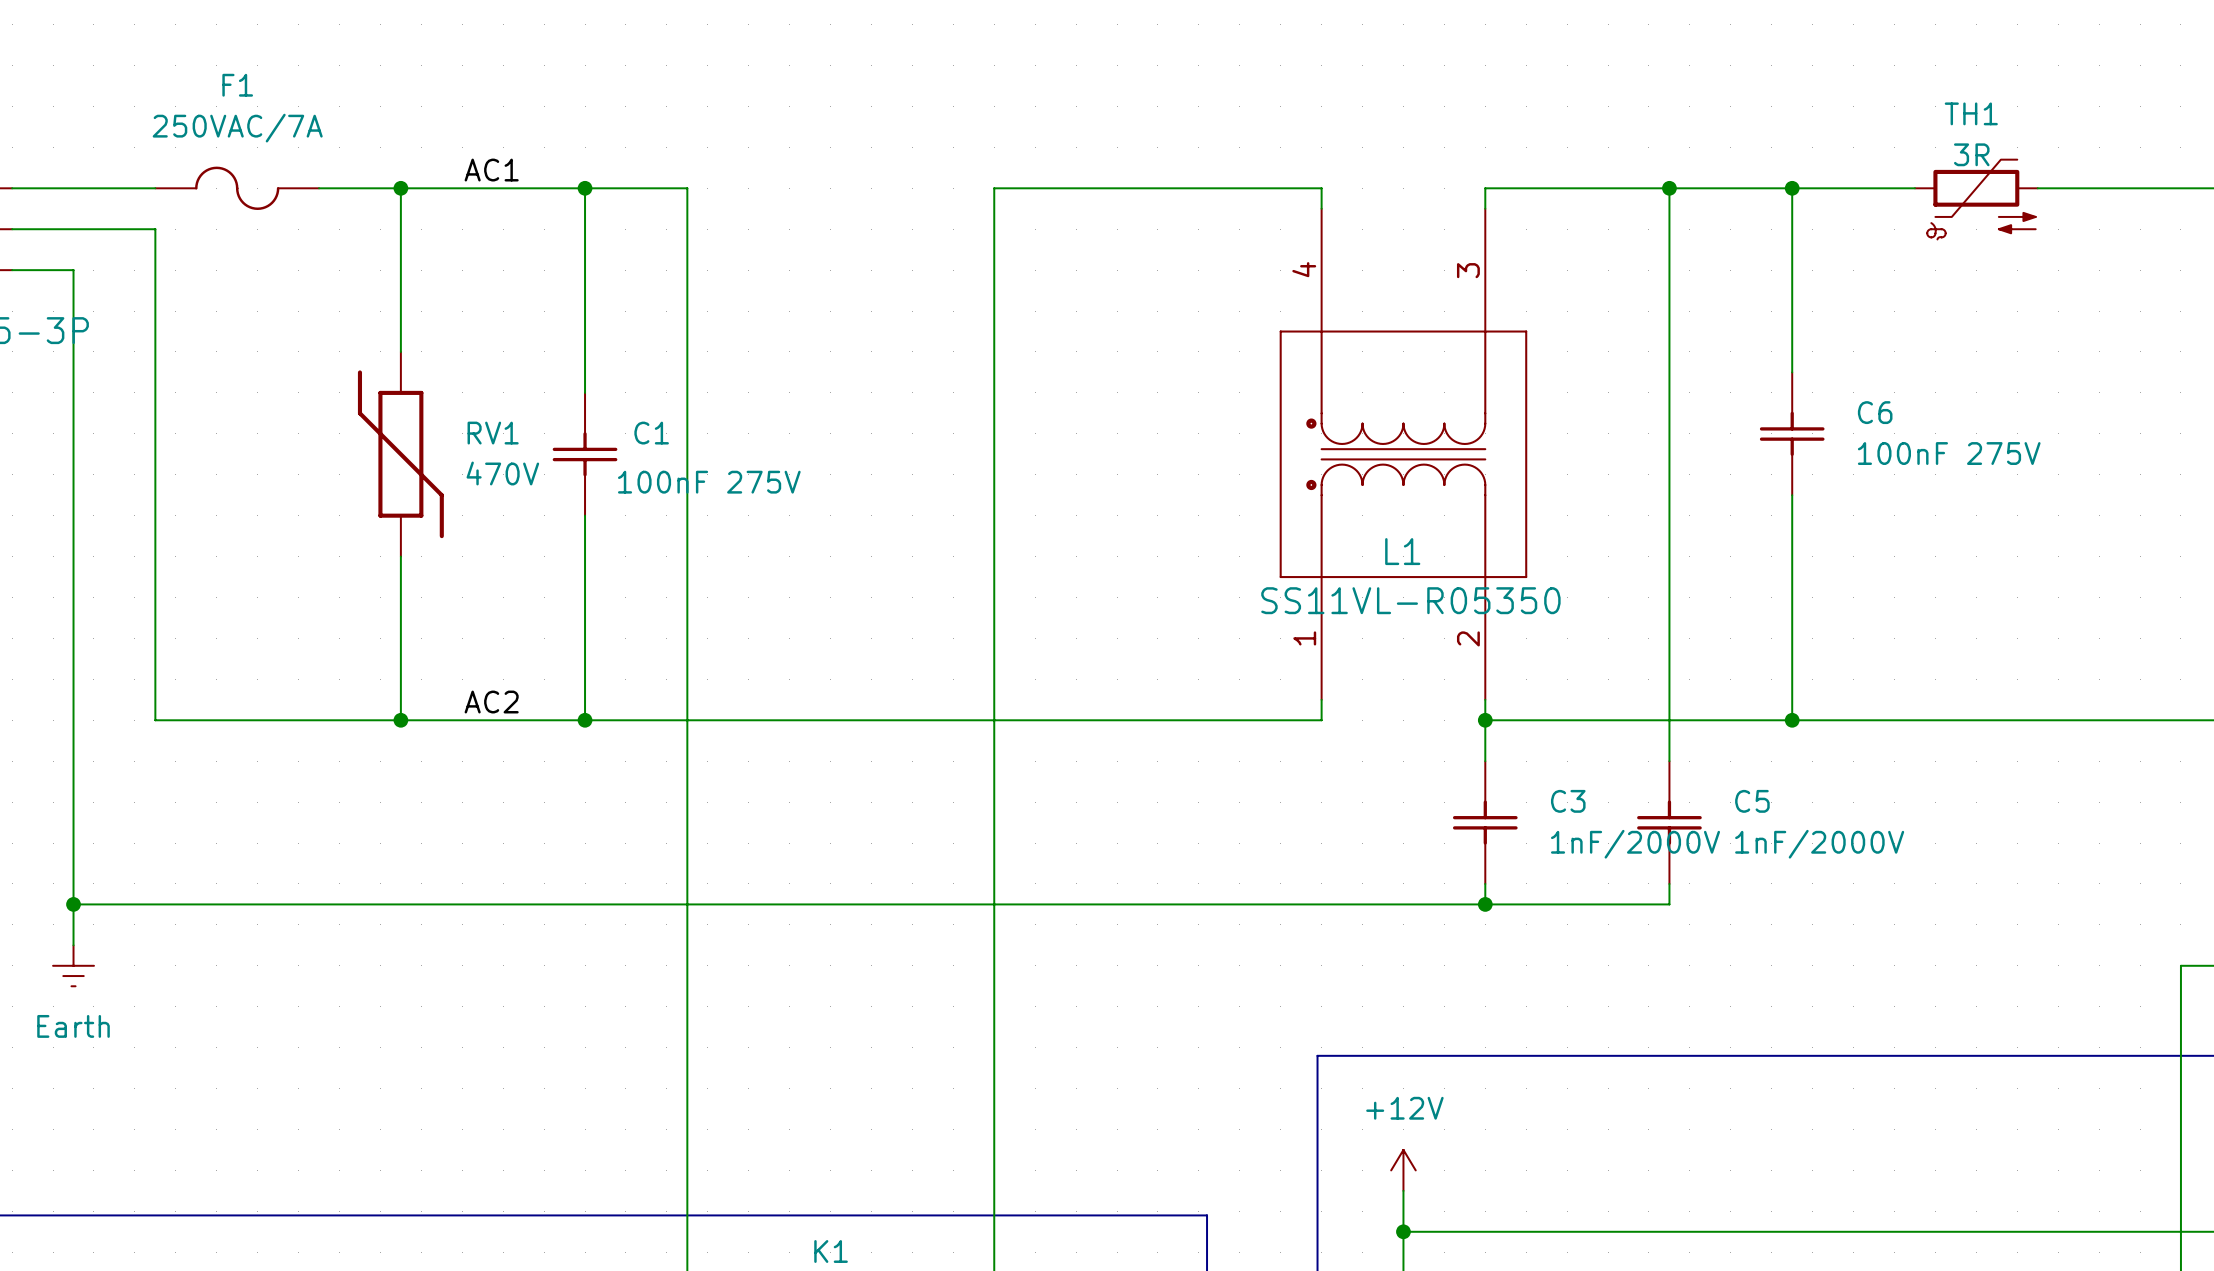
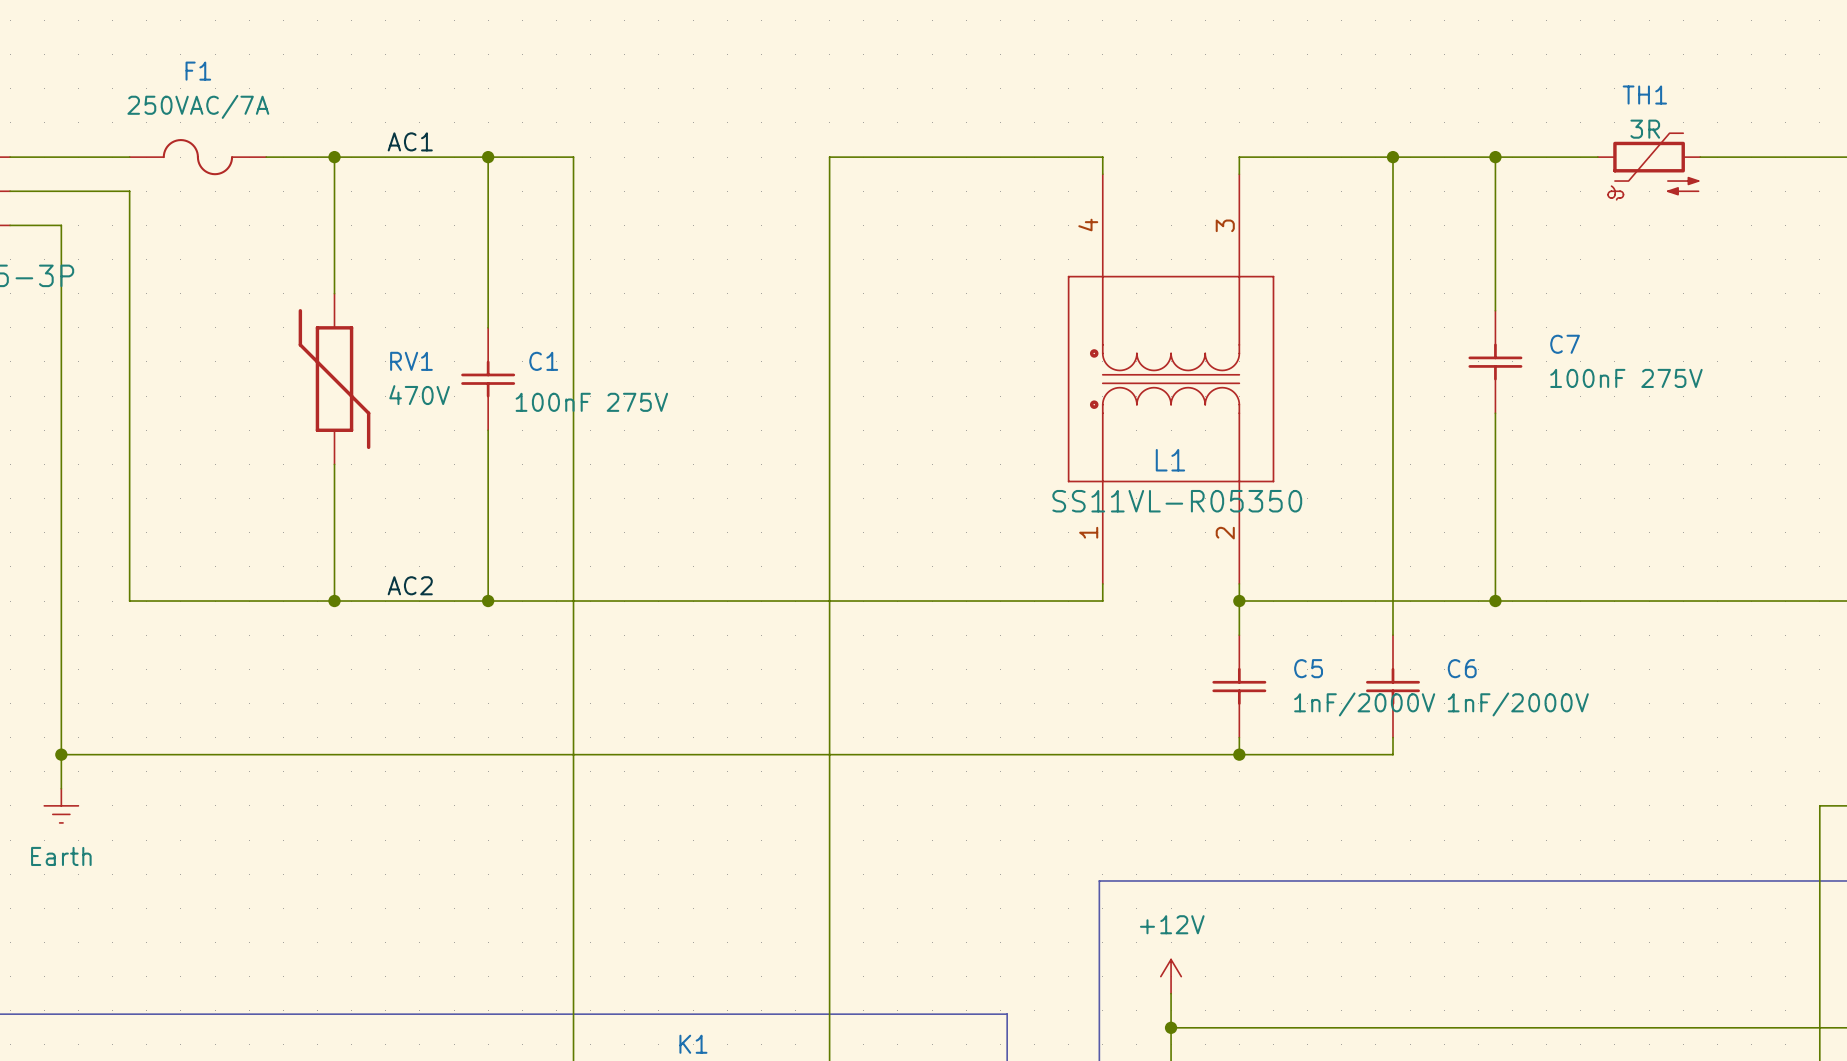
C6 name: C6 (1875, 412) -> C7 (1565, 344)
C3 name: C3 (1568, 801) -> C5 (1308, 668)
C5 name: C5 (1752, 801) -> C6 (1462, 668)

